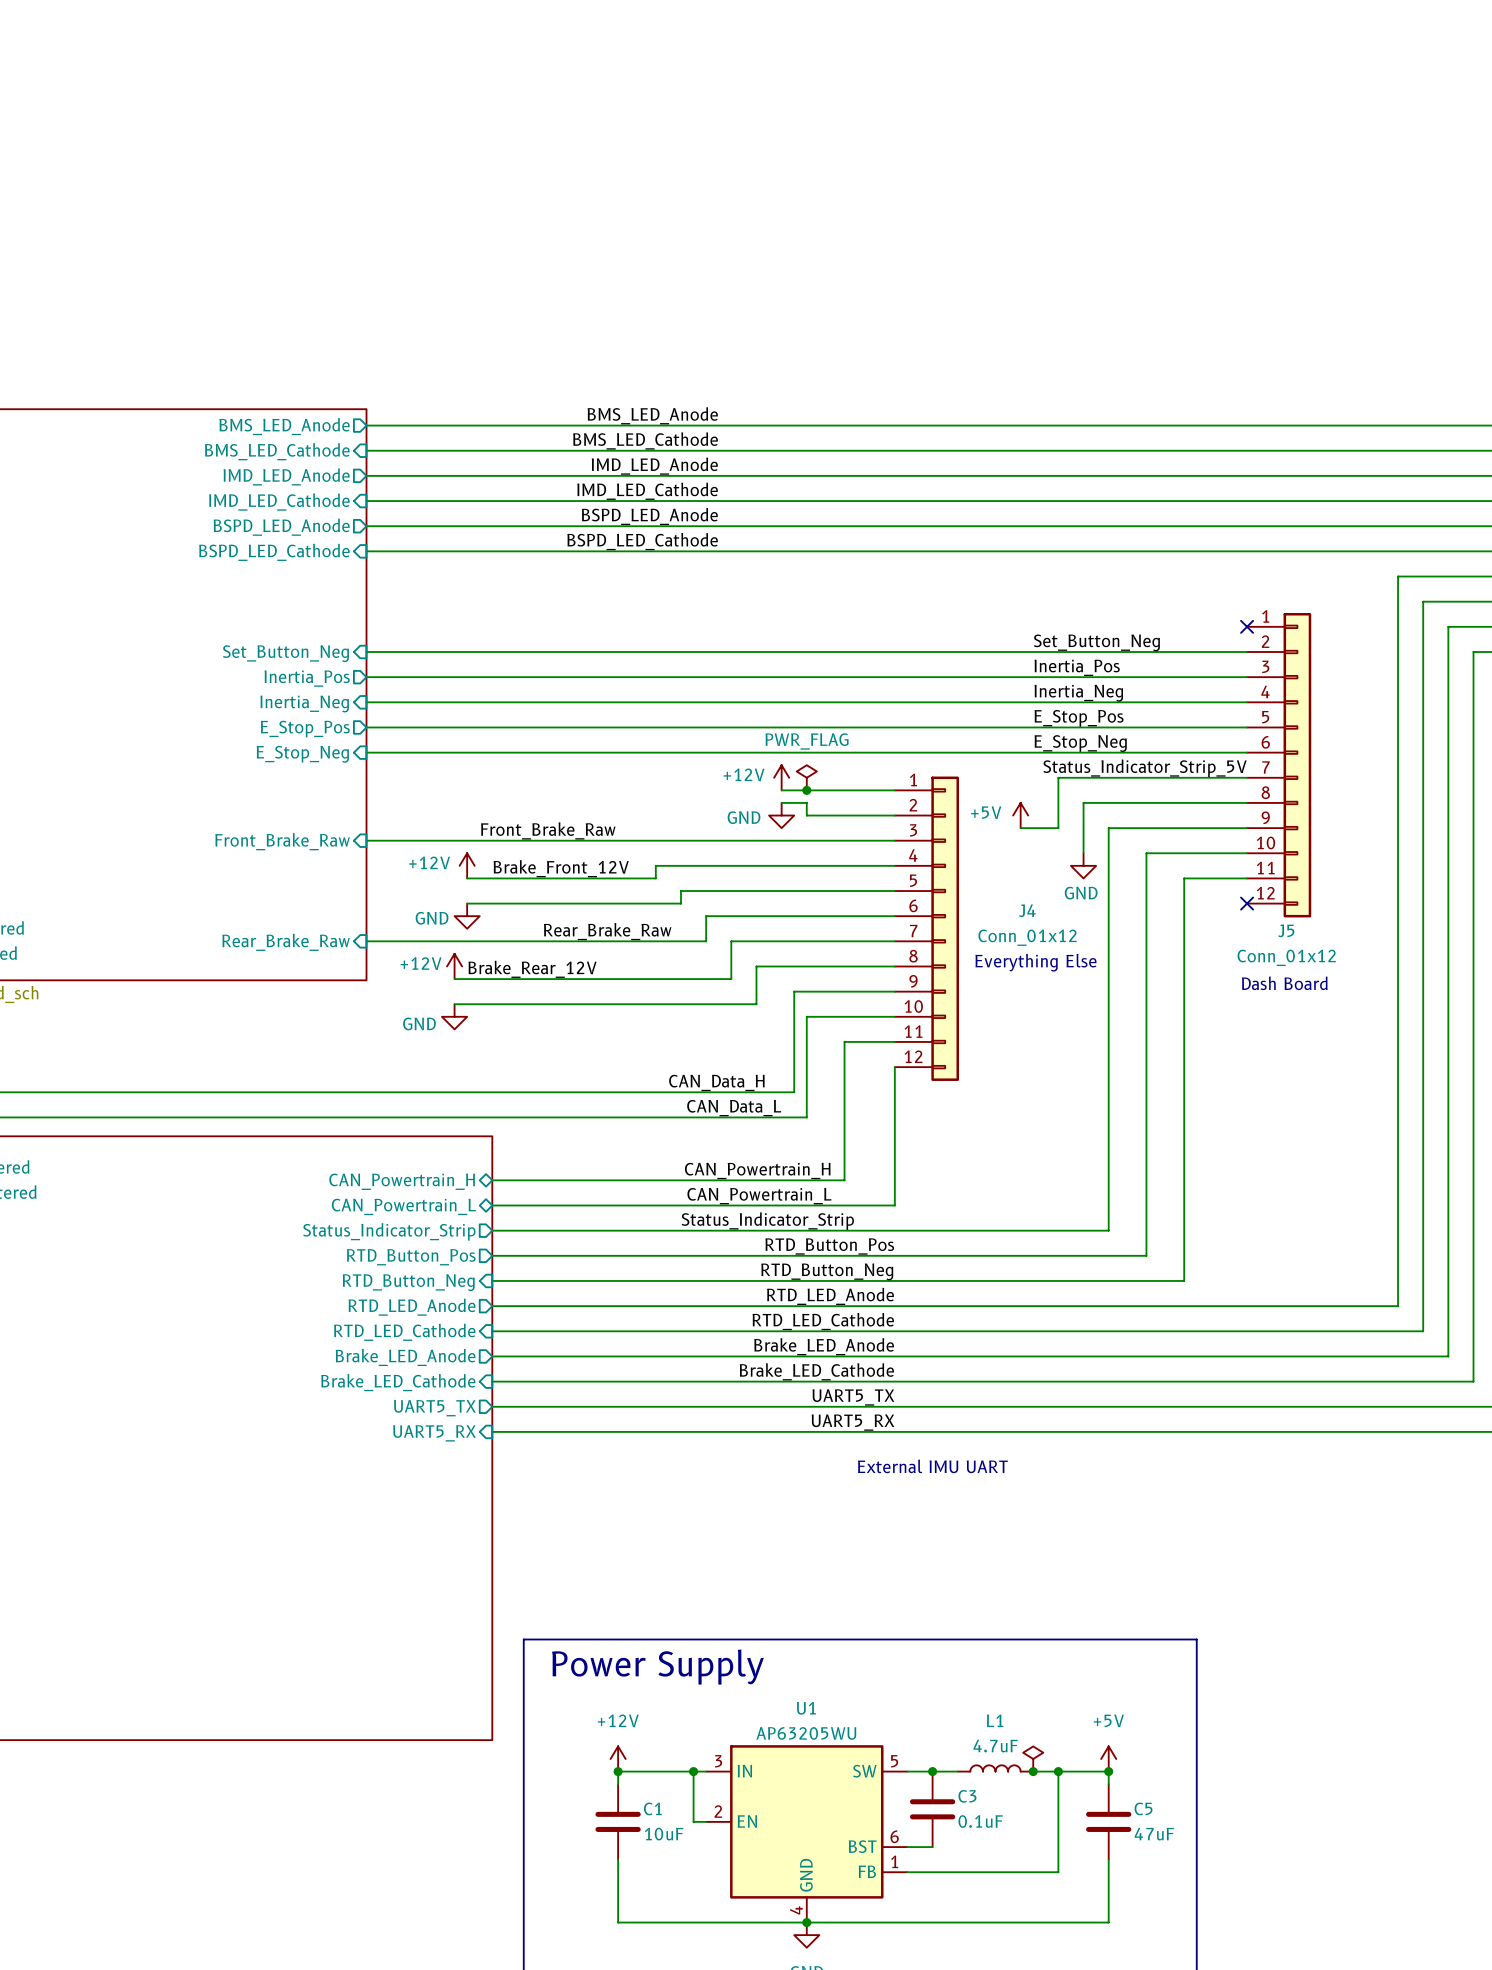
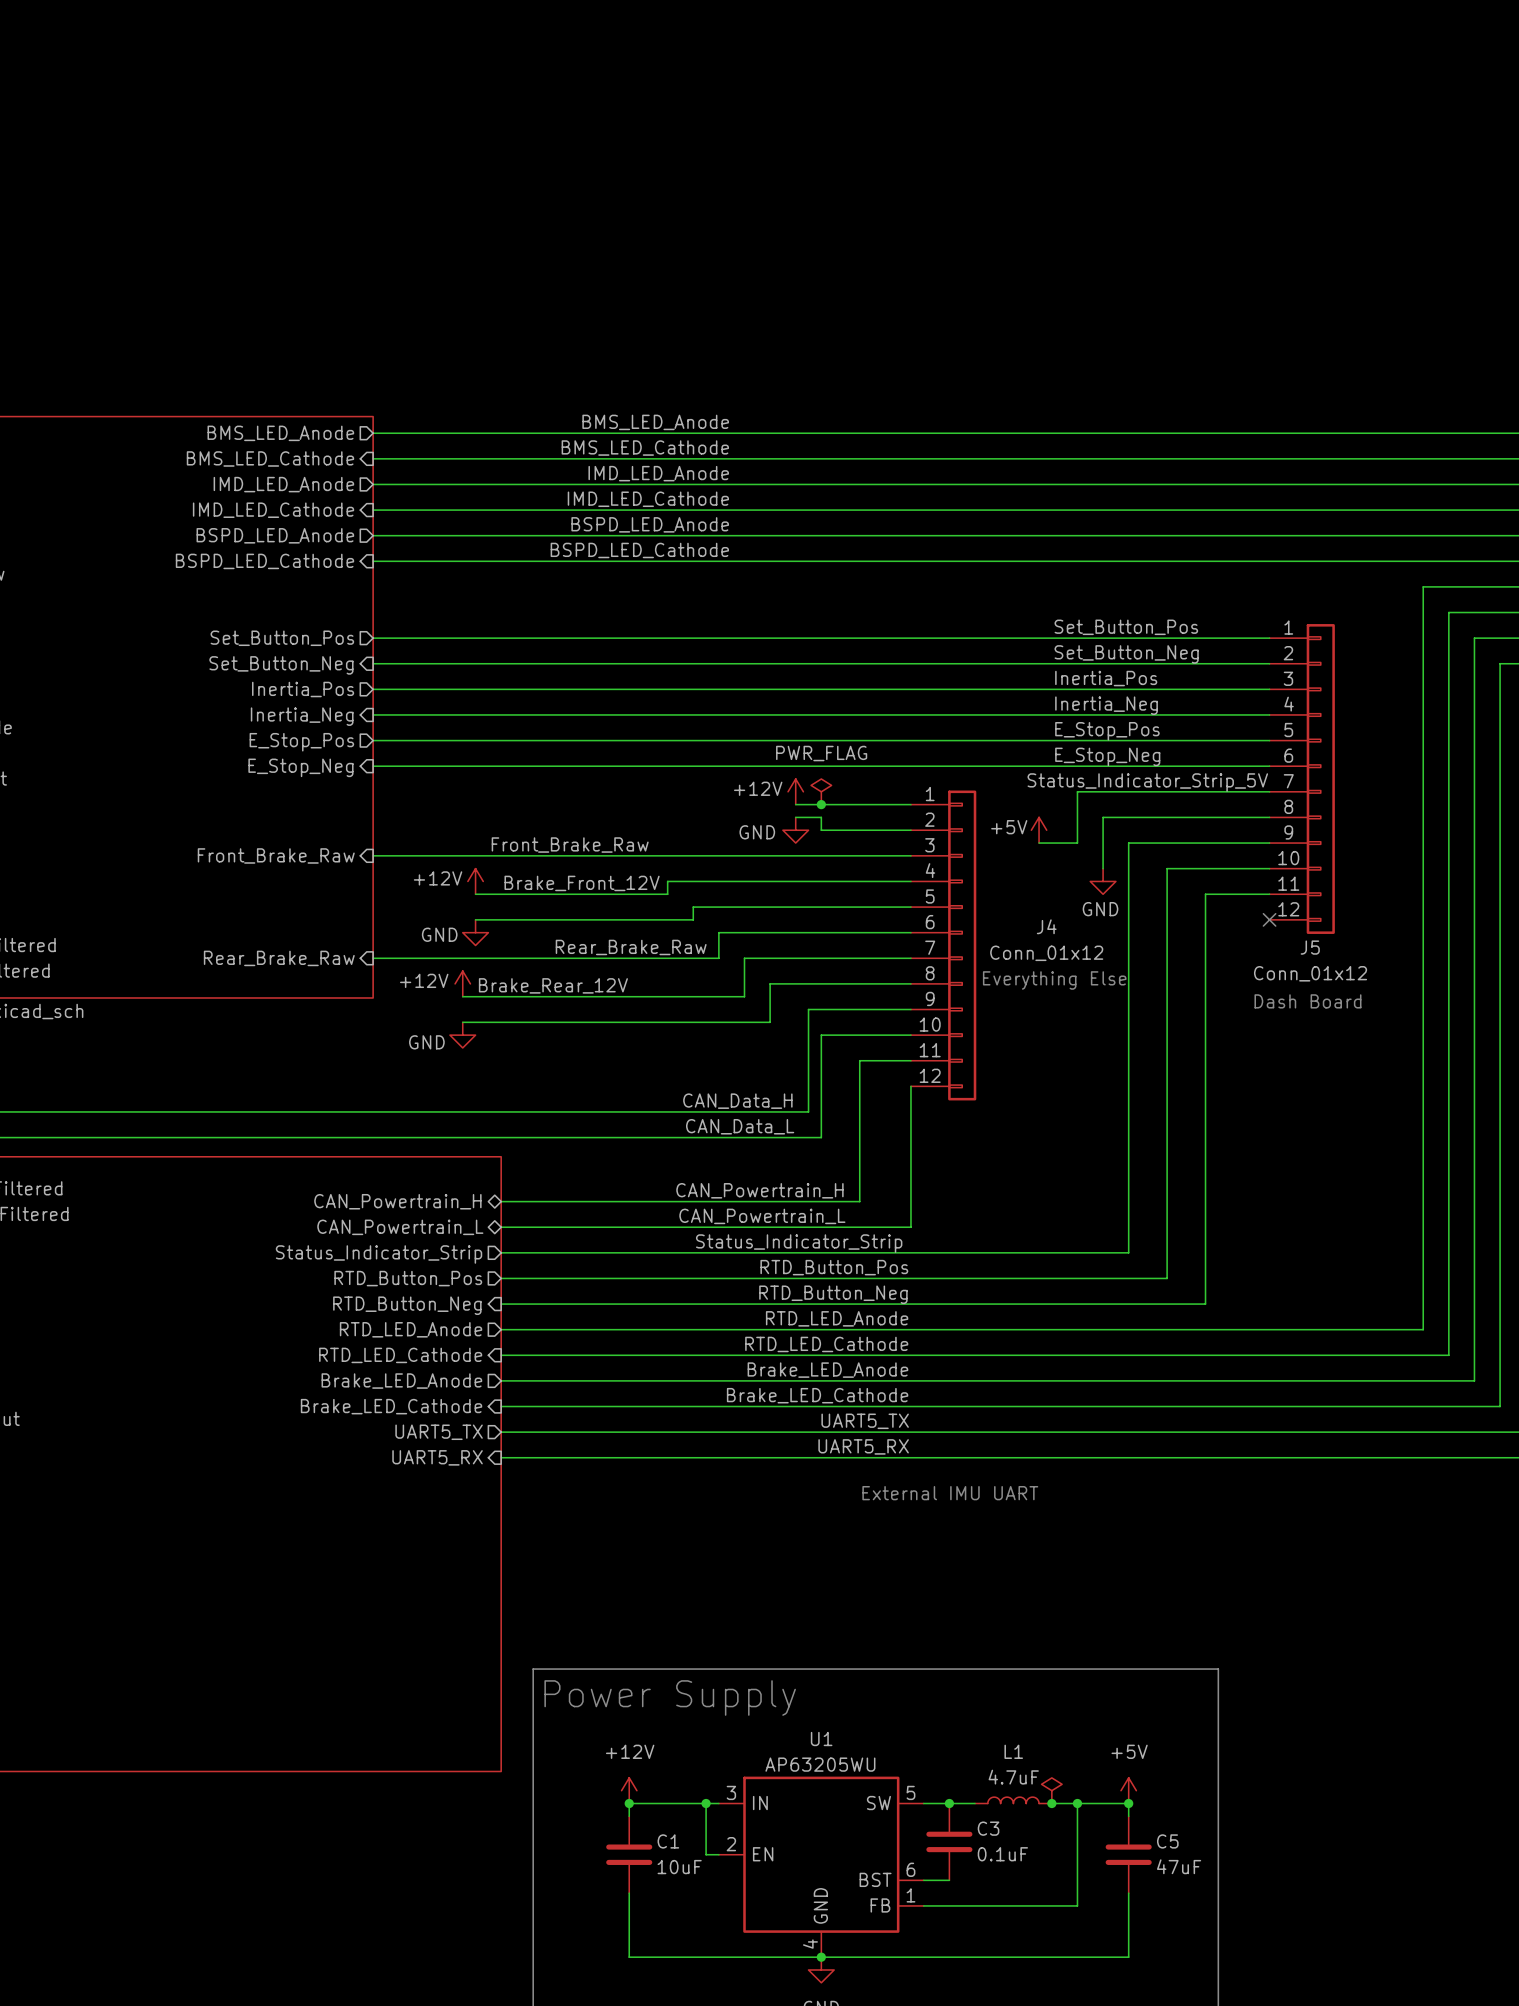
label: none -> Set_Button_Pos (1126, 627)
wire: none -> (373, 638) (1269, 638)
no-connect mark: (1247, 626) -> none
sheet pin: none -> Set_Button_Pos (282, 638)

